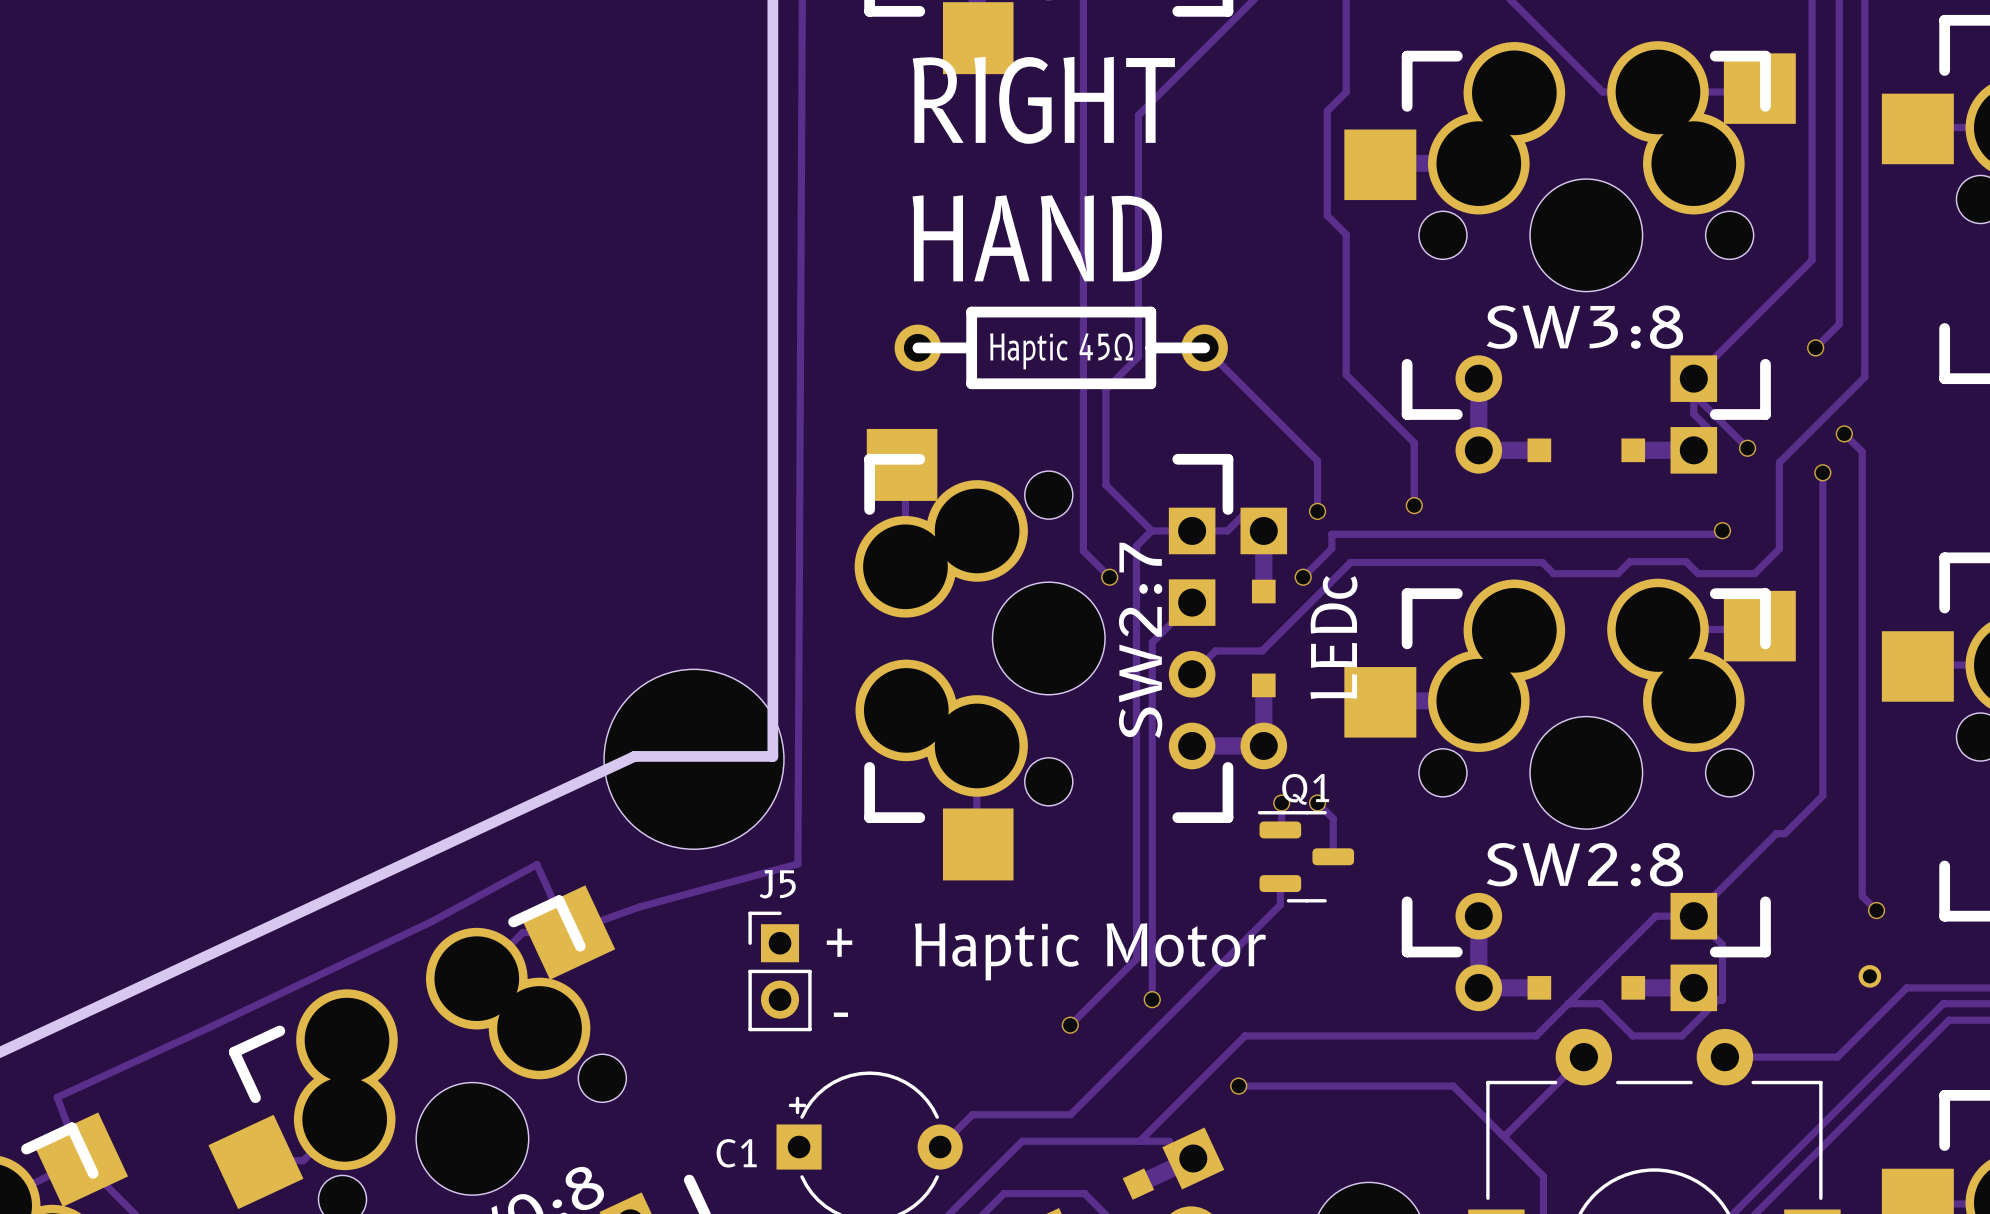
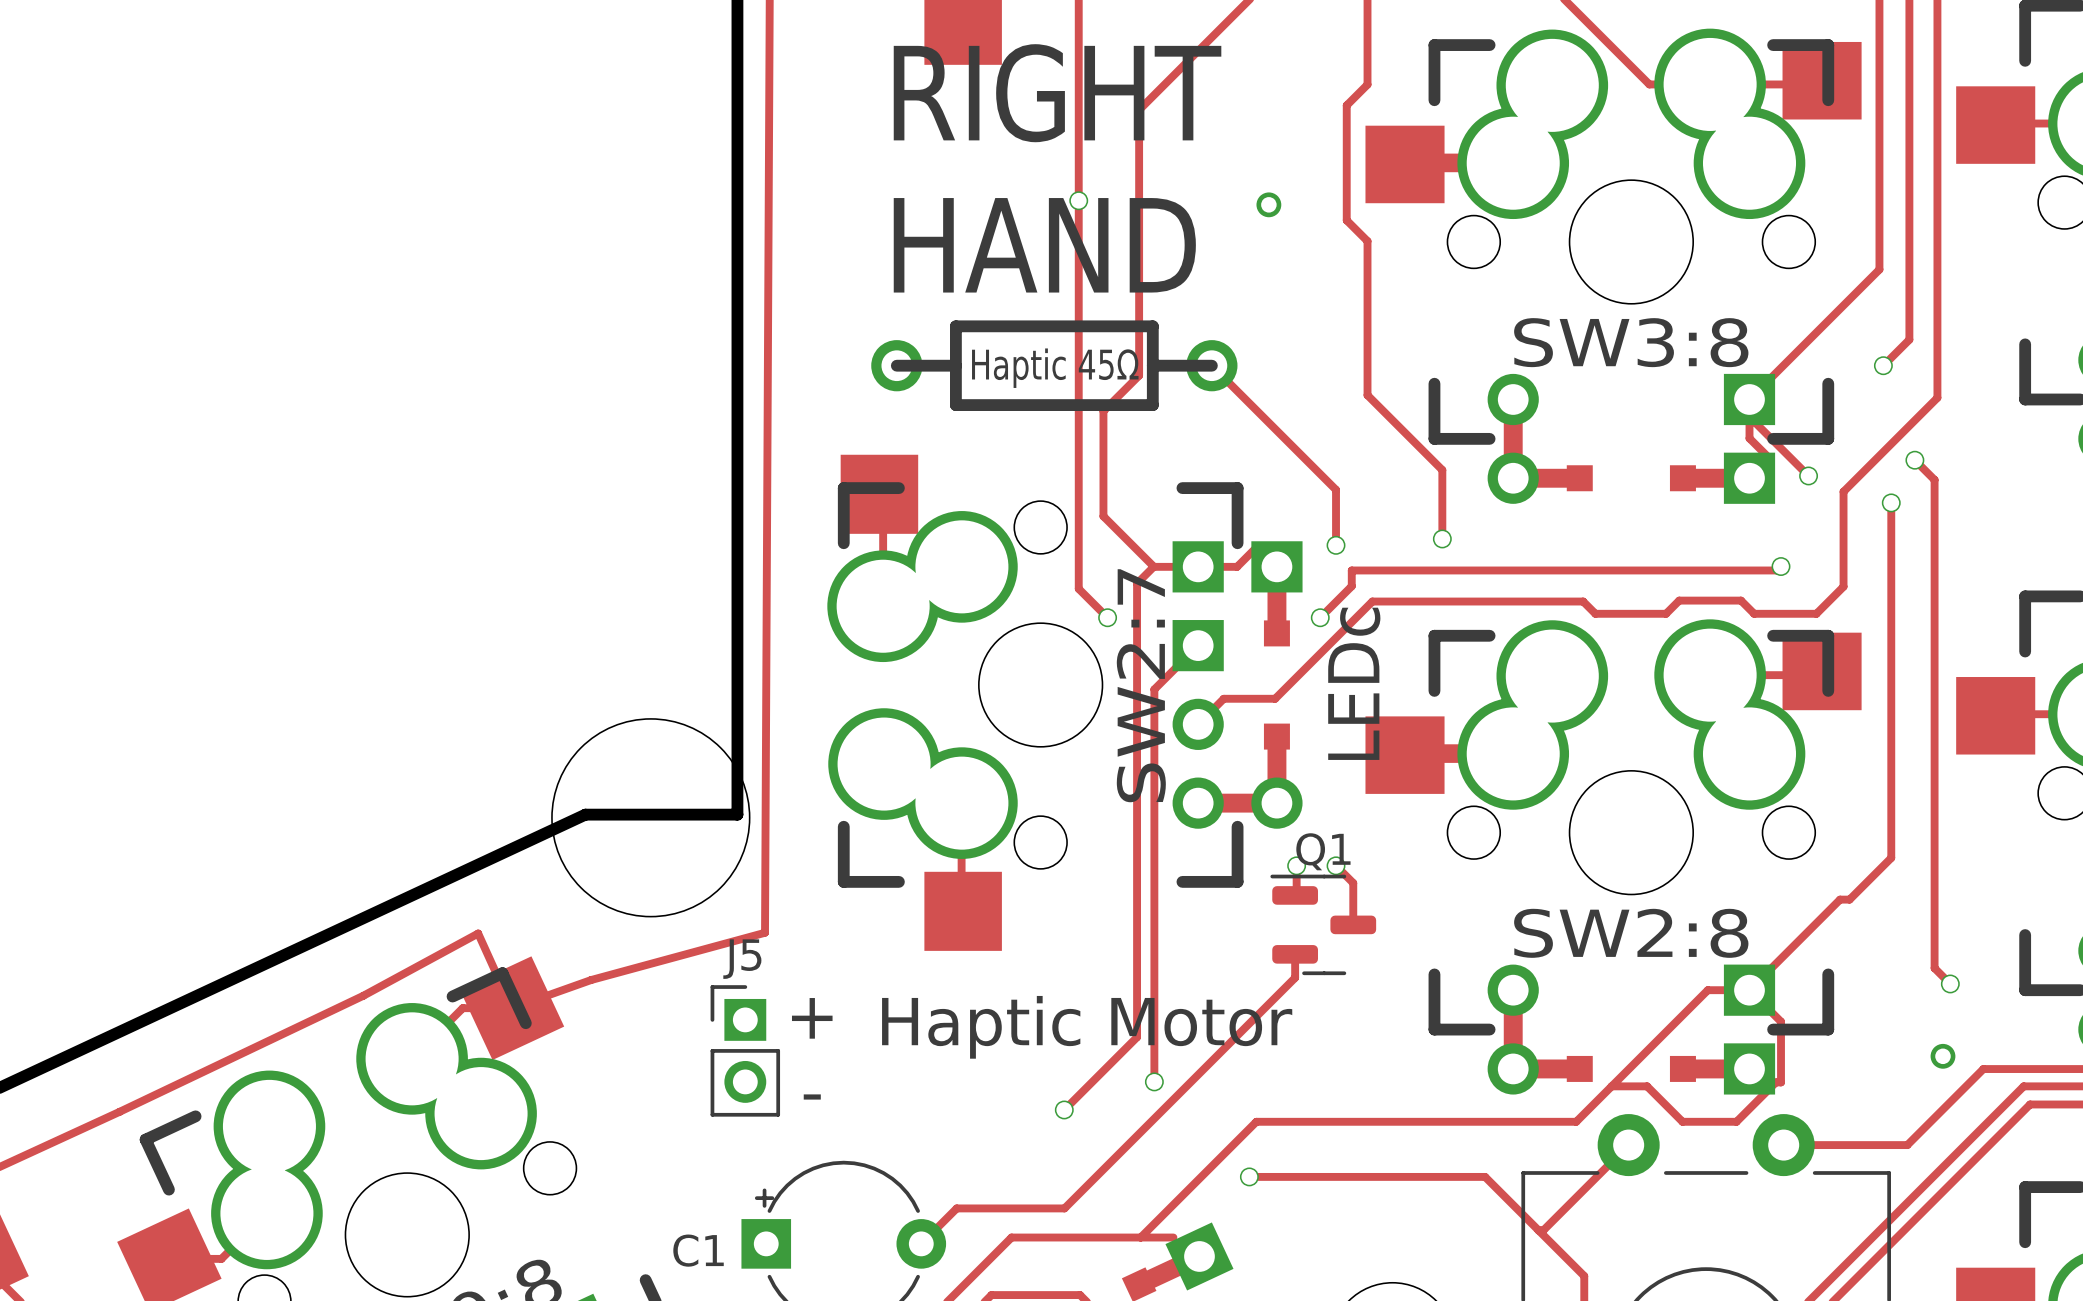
via: none -> (1078, 200)
part: none -> (1268, 204)

